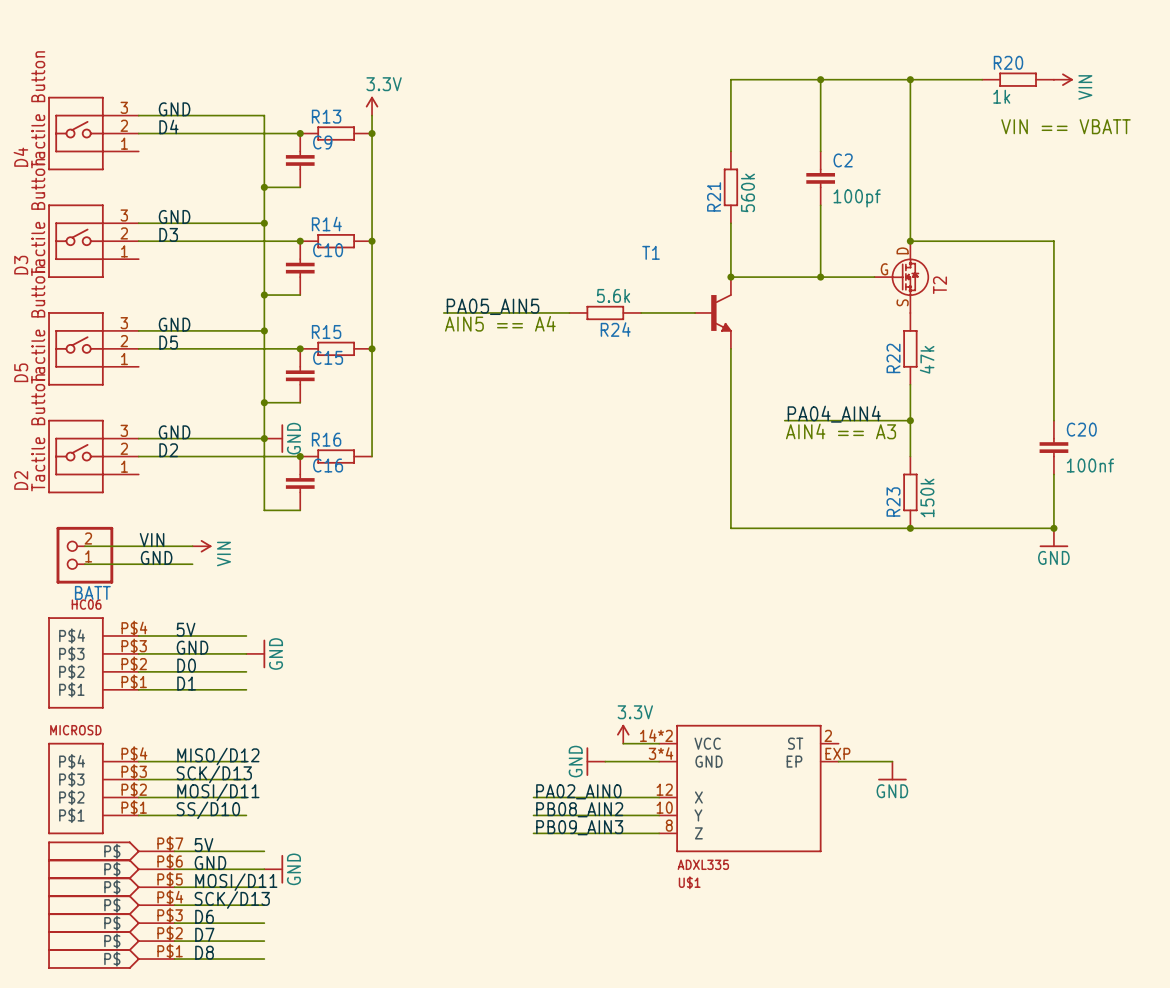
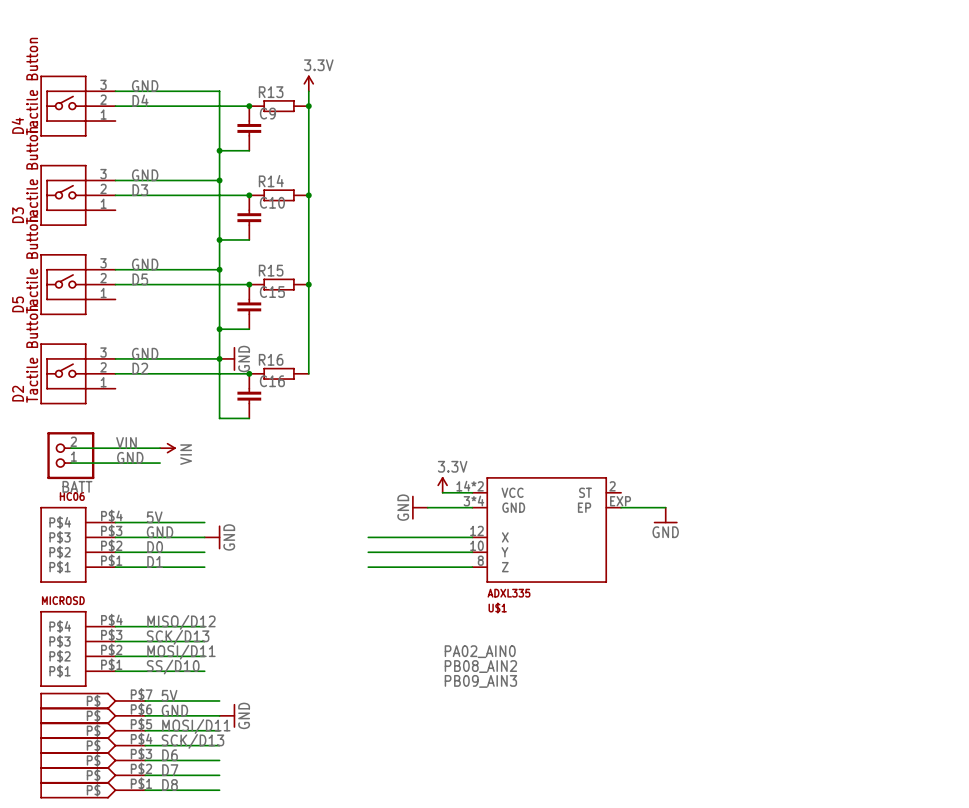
wire: (820, 79) (820, 151) -> none
junction: (820, 79) -> none
wire: (910, 79) (910, 241) (1053, 241) (1053, 420) -> none
junction: (910, 79) -> none
wire: (982, 79) (730, 79) (730, 151) -> none
R20: 1k (1018, 79) -> none
power symbol: VIN (1063, 79) -> none
text: VIN == VBATT (1066, 126) -> none
C2: 100pf (820, 178) -> none
R21: 560k (730, 187) -> none
wire: (820, 205) (820, 277) -> none
wire: (730, 223) (730, 277) (874, 277) -> none
junction: (910, 241) -> none
junction: (730, 277) -> none
junction: (820, 277) -> none
T2: (901, 277) -> none
label: PA05_AIN5 (493, 306) -> none
wire: (443, 312) (569, 312) -> none
R24: 5.6k (605, 312) -> none
wire: (641, 312) (695, 312) -> none
T1: (713, 312) -> none
text: AIN5 == A4 (500, 323) -> none
wire: (730, 348) (730, 528) (1053, 528) (1053, 474) -> none
R22: 47k (910, 348) -> none
wire: (910, 384) (910, 456) -> none
label: PA04_AIN4 (834, 414) -> none
wire: (784, 420) (910, 420) -> none
junction: (910, 420) -> none
text: AIN4 == A3 (841, 431) -> none
C20: 100nf (1053, 447) -> none
R23: 150k (910, 492) -> none
junction: (910, 528) -> none
junction: (1053, 528) -> none
power symbol: GND (1053, 537) -> none
power symbol: none -> GND (419, 507)
power symbol: none -> GND (665, 515)
power symbol position: 3.3V (623, 734) -> 3.3V (442, 484)
wire: (623, 743) (659, 743) -> (442, 492) (472, 492)
power symbol: GND (595, 761) -> none
wire: (605, 761) (659, 761) -> (427, 507) (472, 507)
wire: (838, 761) (892, 761) -> (621, 507) (665, 507)
power symbol: GND (892, 771) -> none
U$1 position: (748, 788) -> (546, 529)
wire: (533, 797) (659, 797) -> (368, 537) (472, 537)
wire: (533, 815) (659, 815) -> (368, 552) (472, 552)
wire: (533, 833) (659, 833) -> (368, 567) (472, 567)

